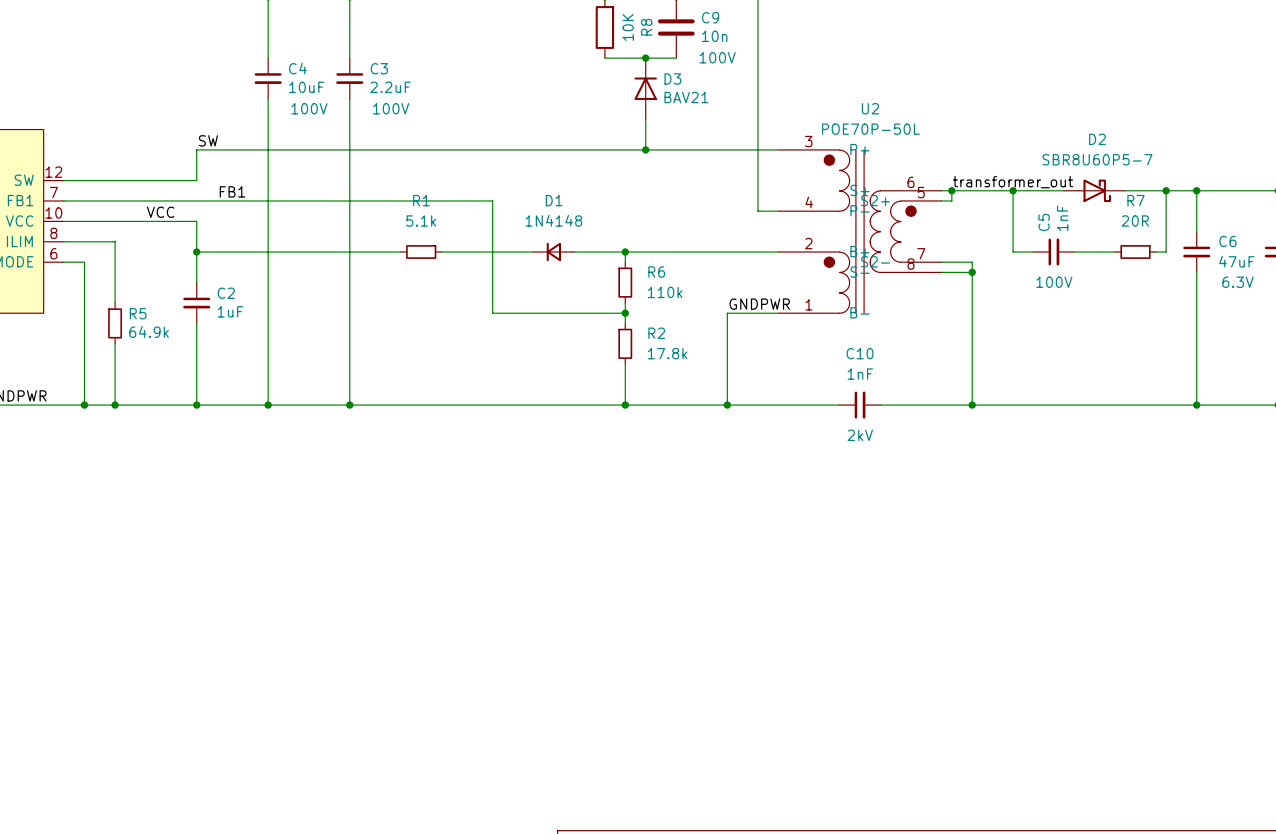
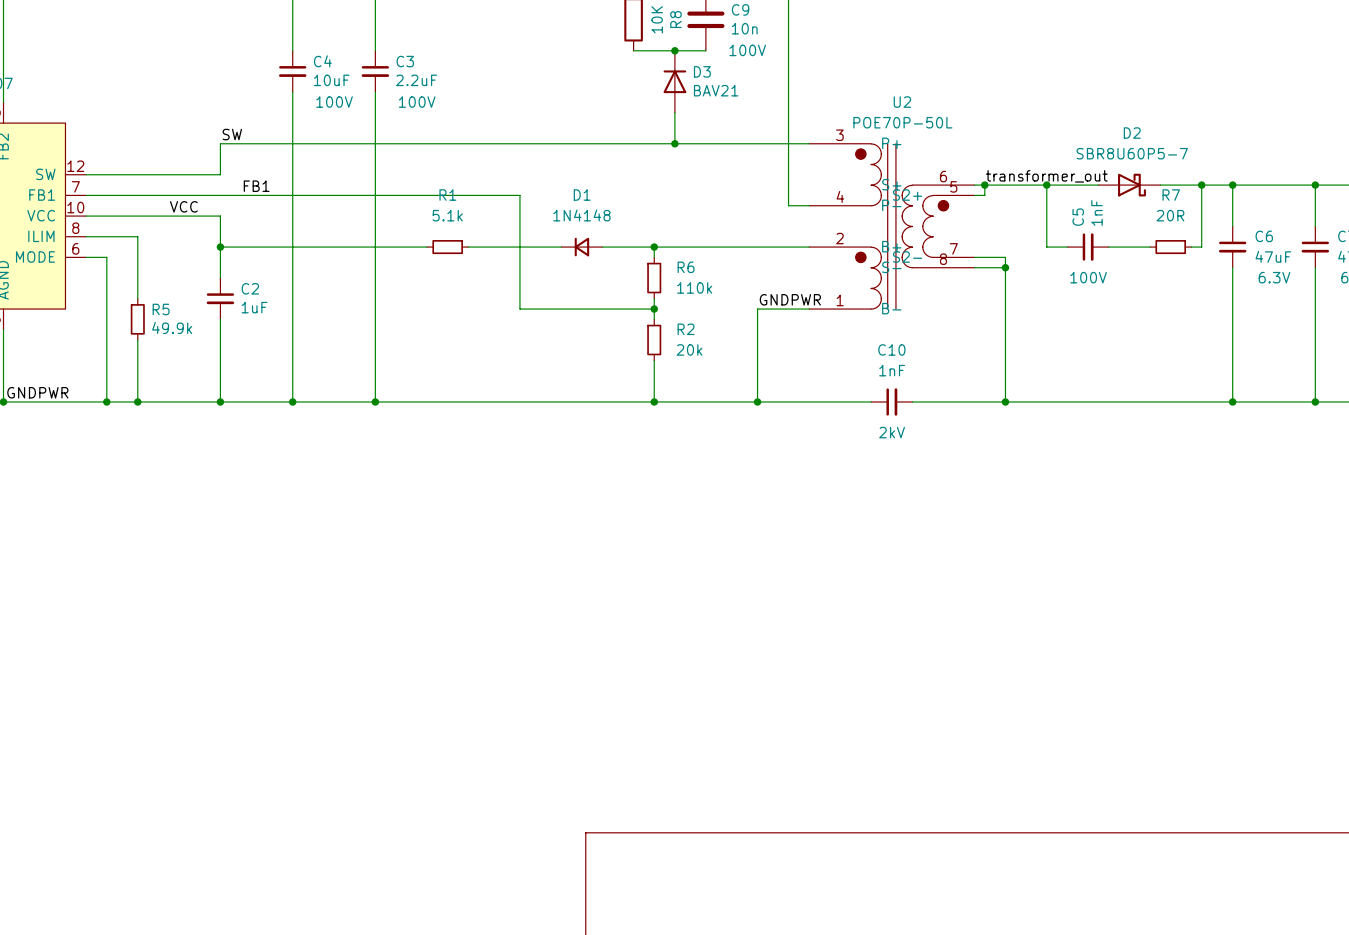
R5 value: 64.9k (149, 331) -> 49.9k (172, 328)
R2 value: 17.8k (667, 353) -> 20k (689, 349)

